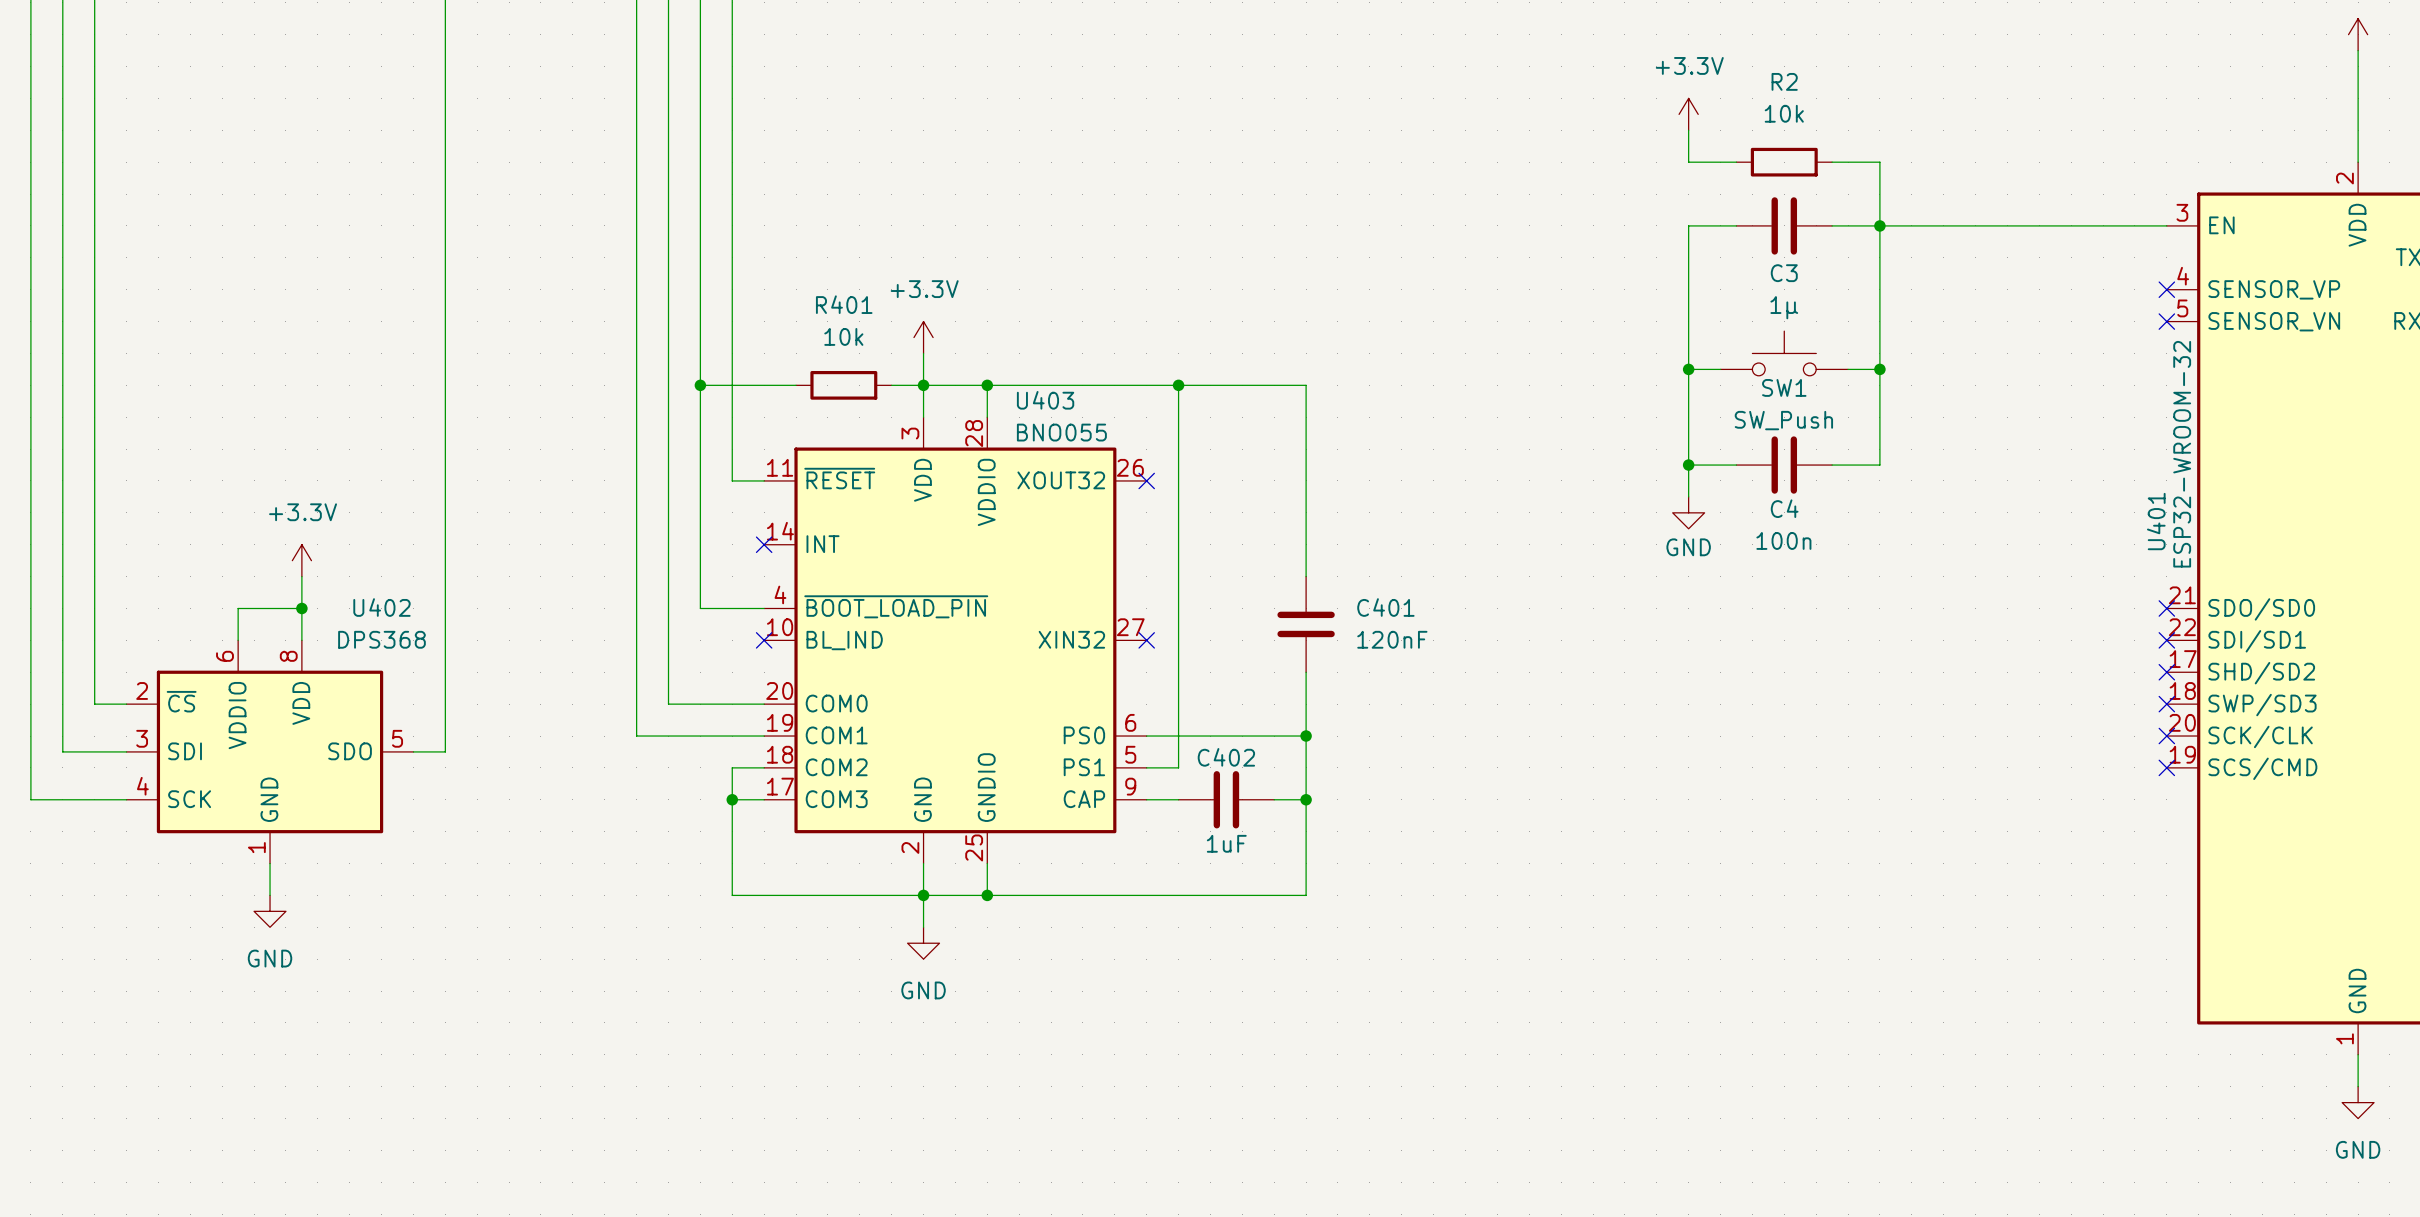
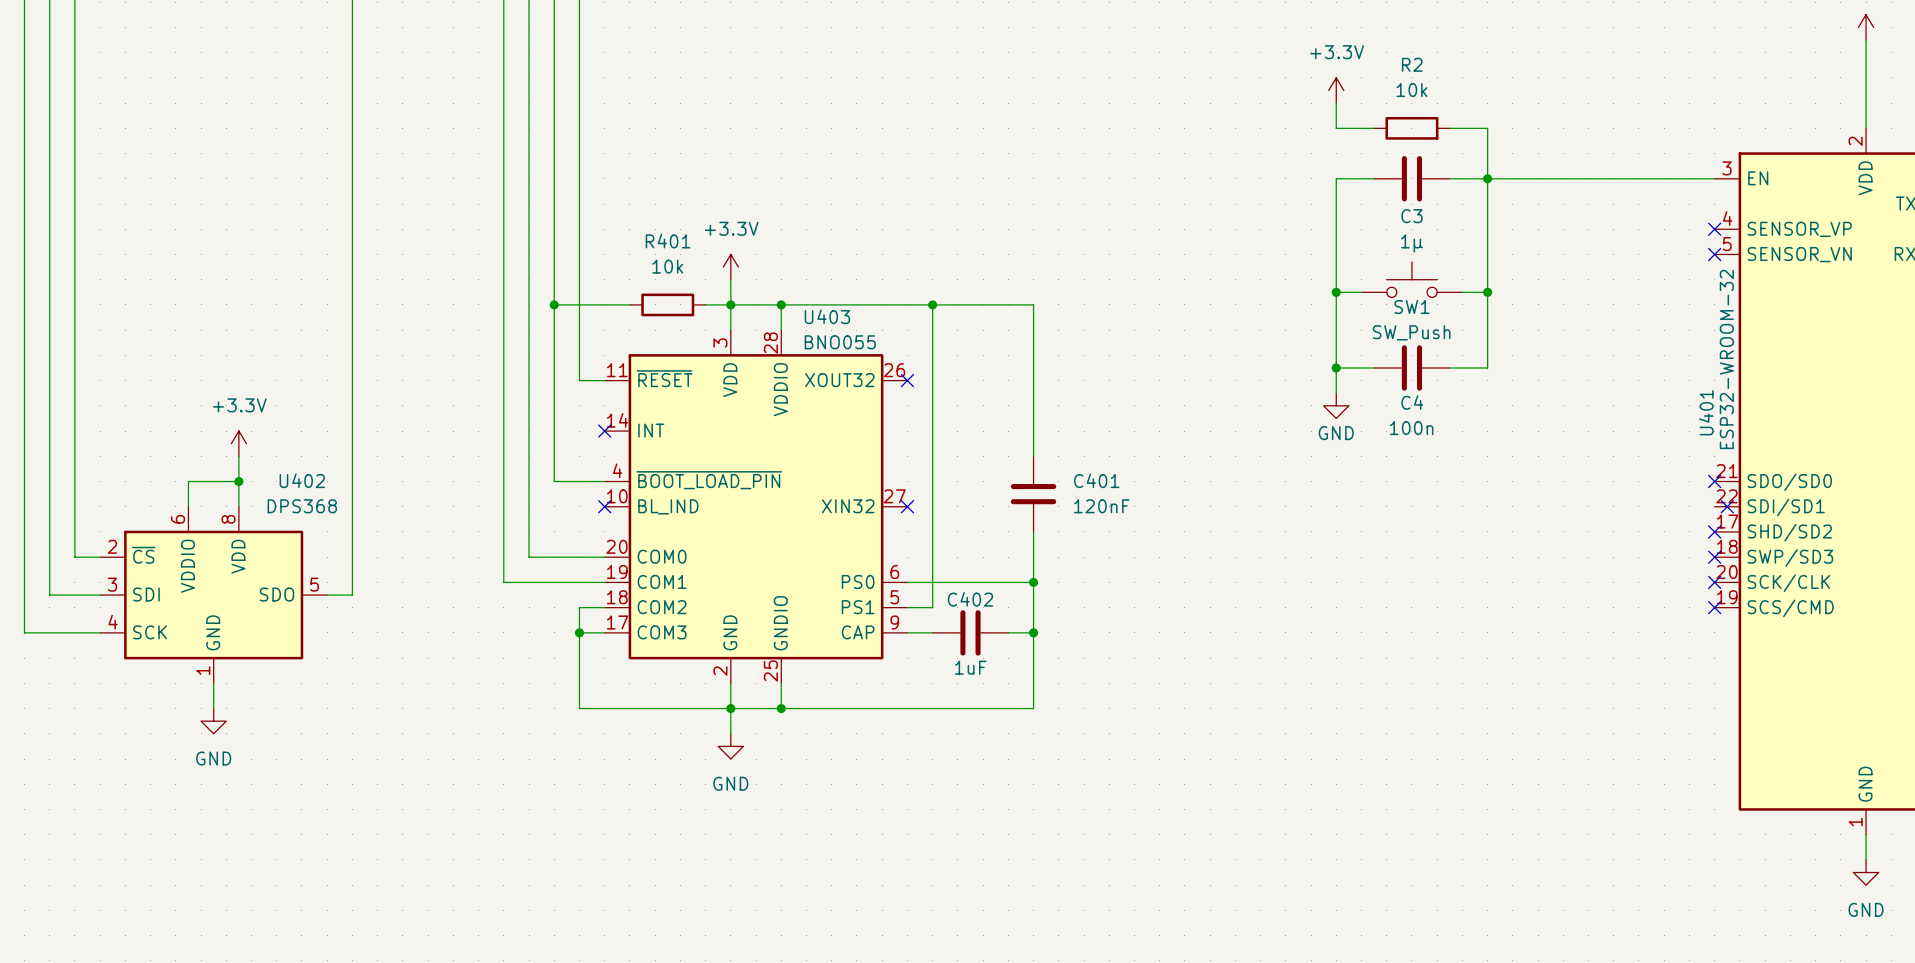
no-connect mark position: (2166, 640) -> (1727, 506)

